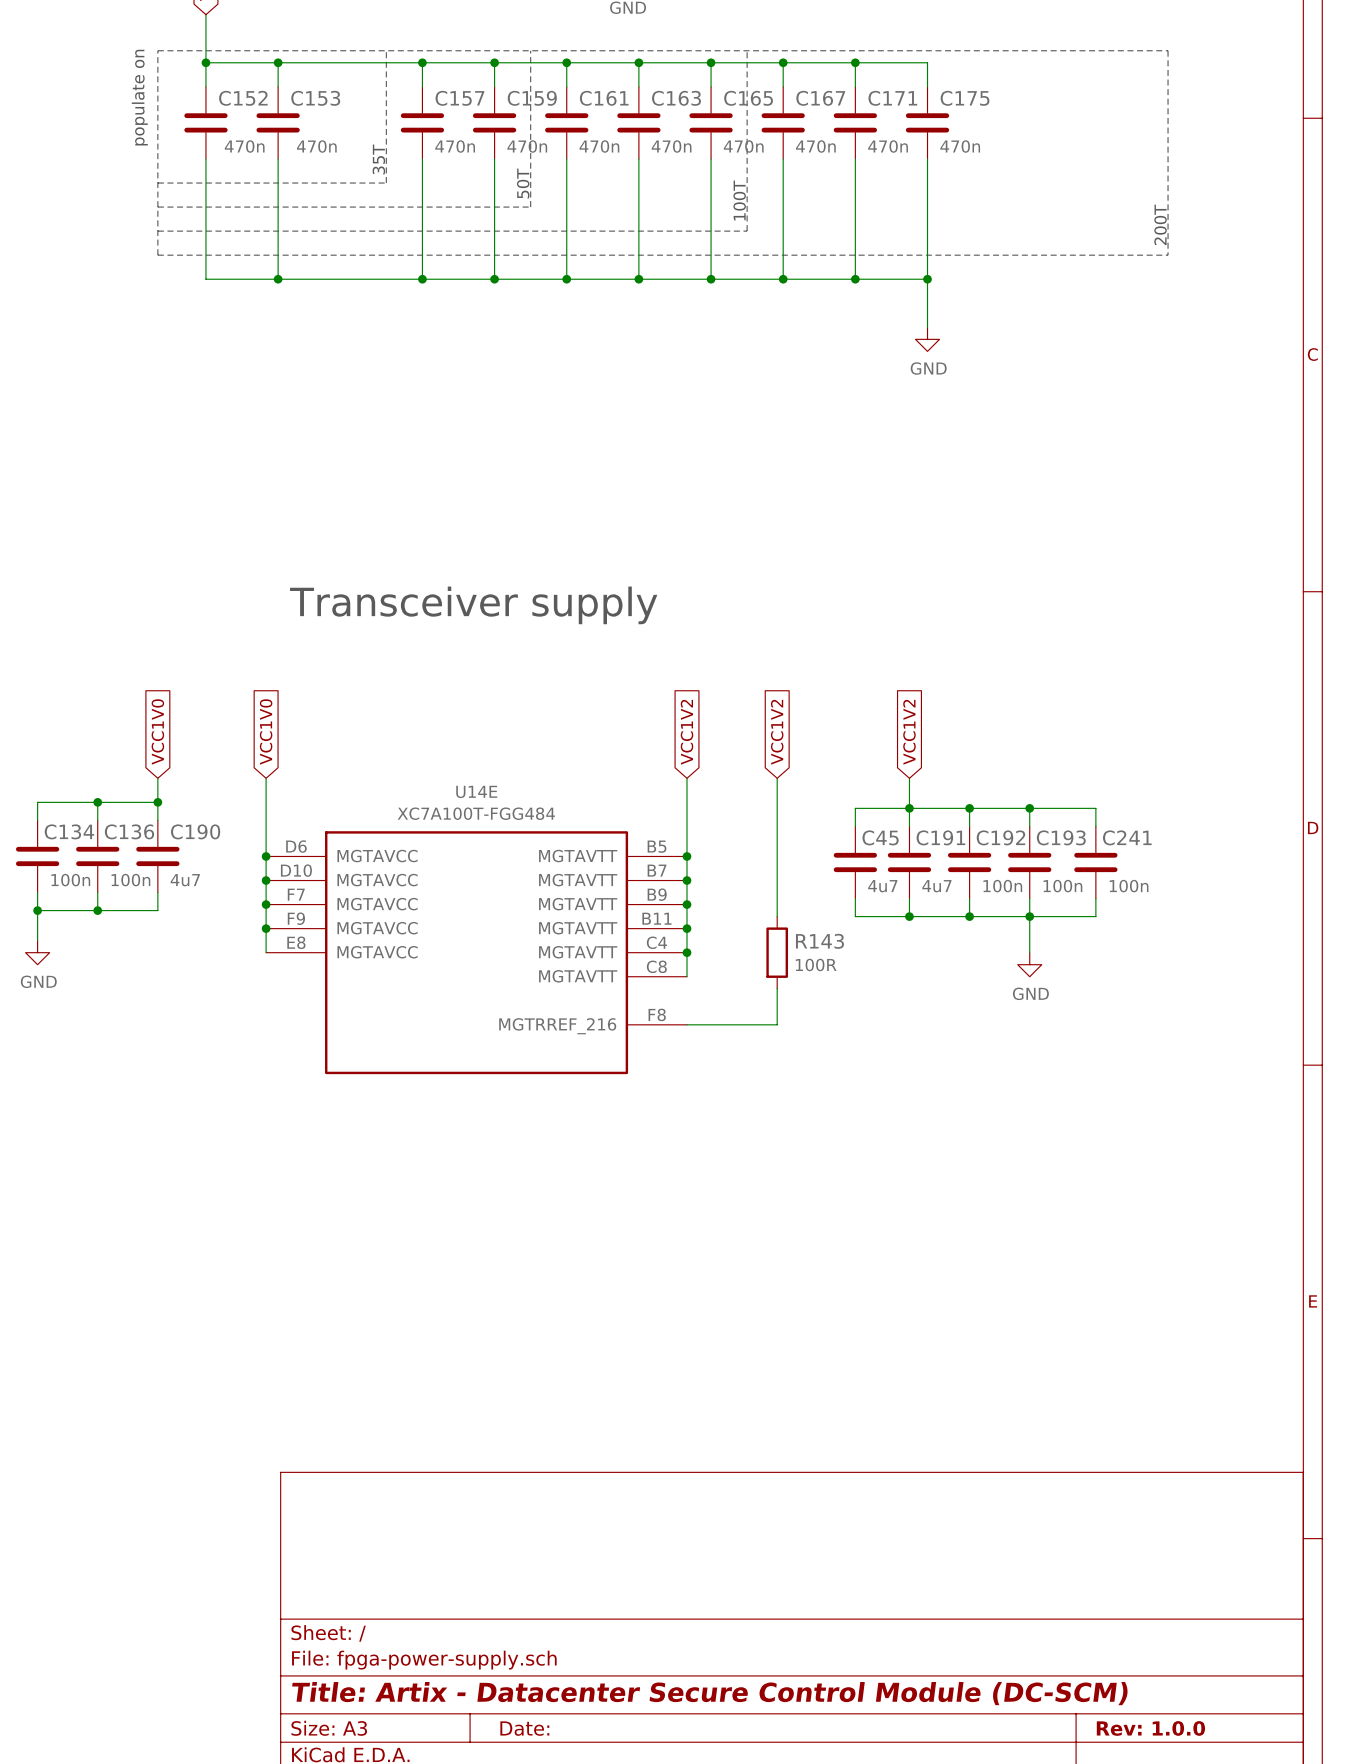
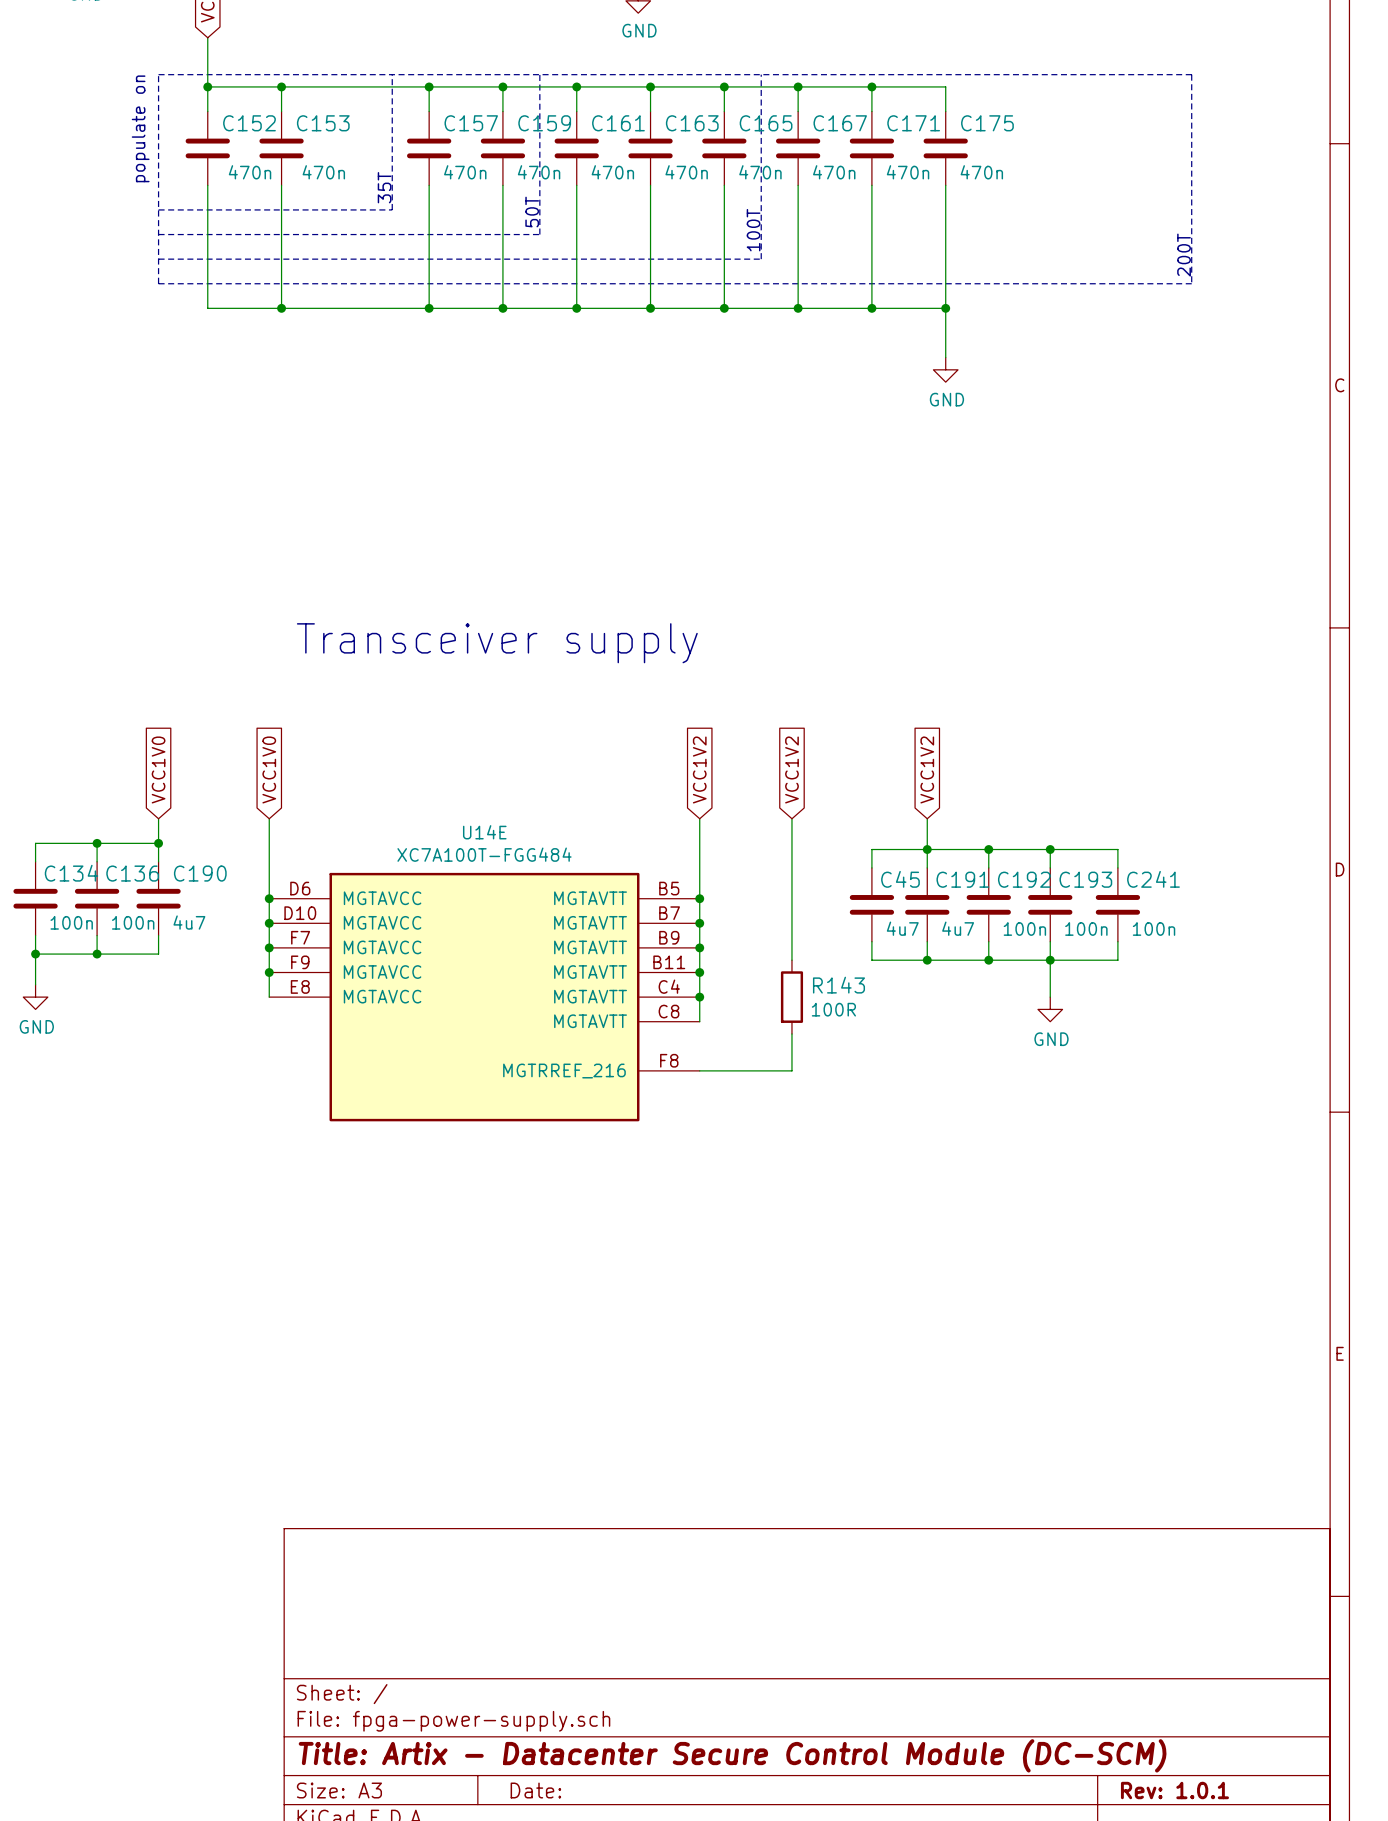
title block: Rev: 1.0.0 (1150, 1728) -> Rev: 1.0.1 (1174, 1790)

